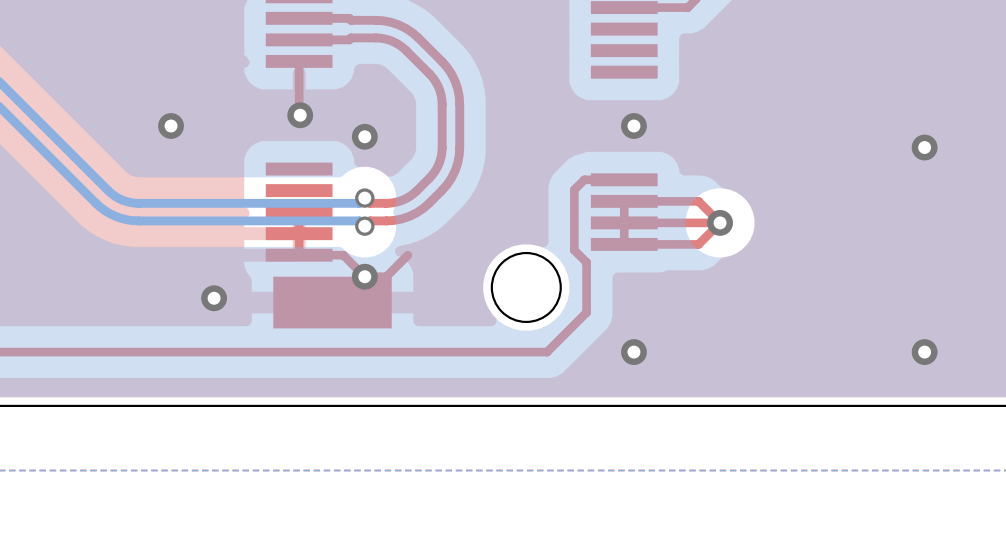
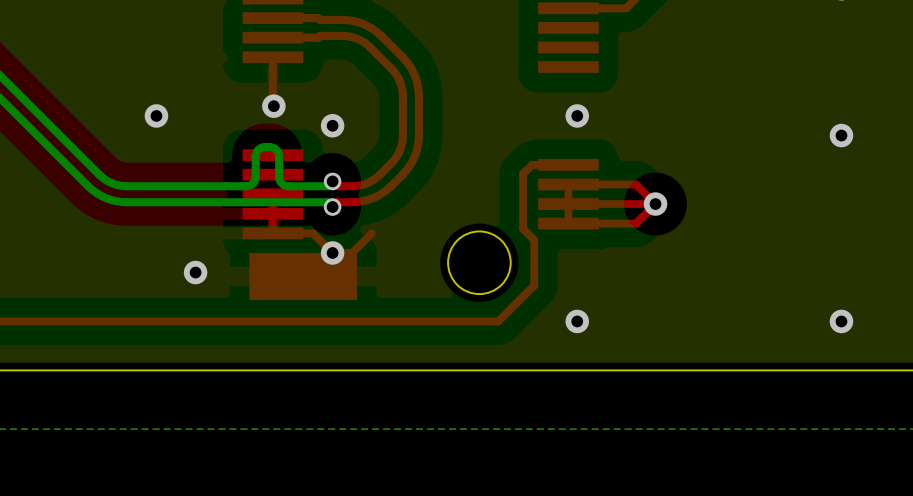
bottom track: (316, 203) (269, 203) -> (288, 186) (282, 184) (279, 179) (278, 152) (269, 147) (261, 147) (257, 151) (255, 179) (251, 184) (246, 186)

